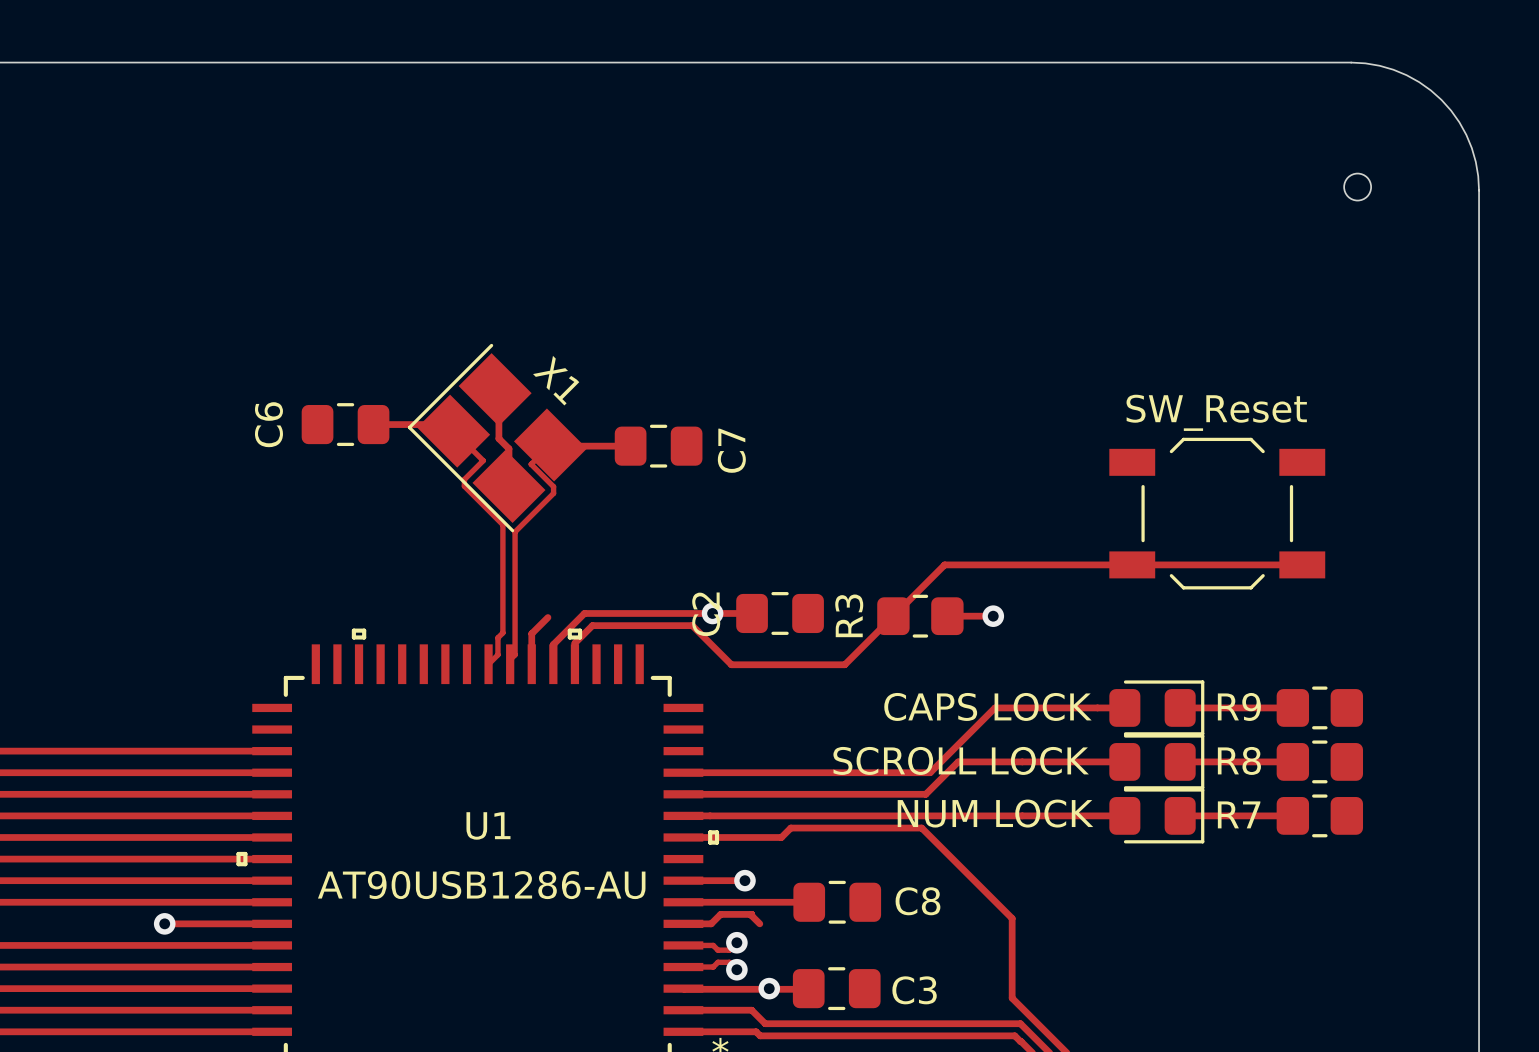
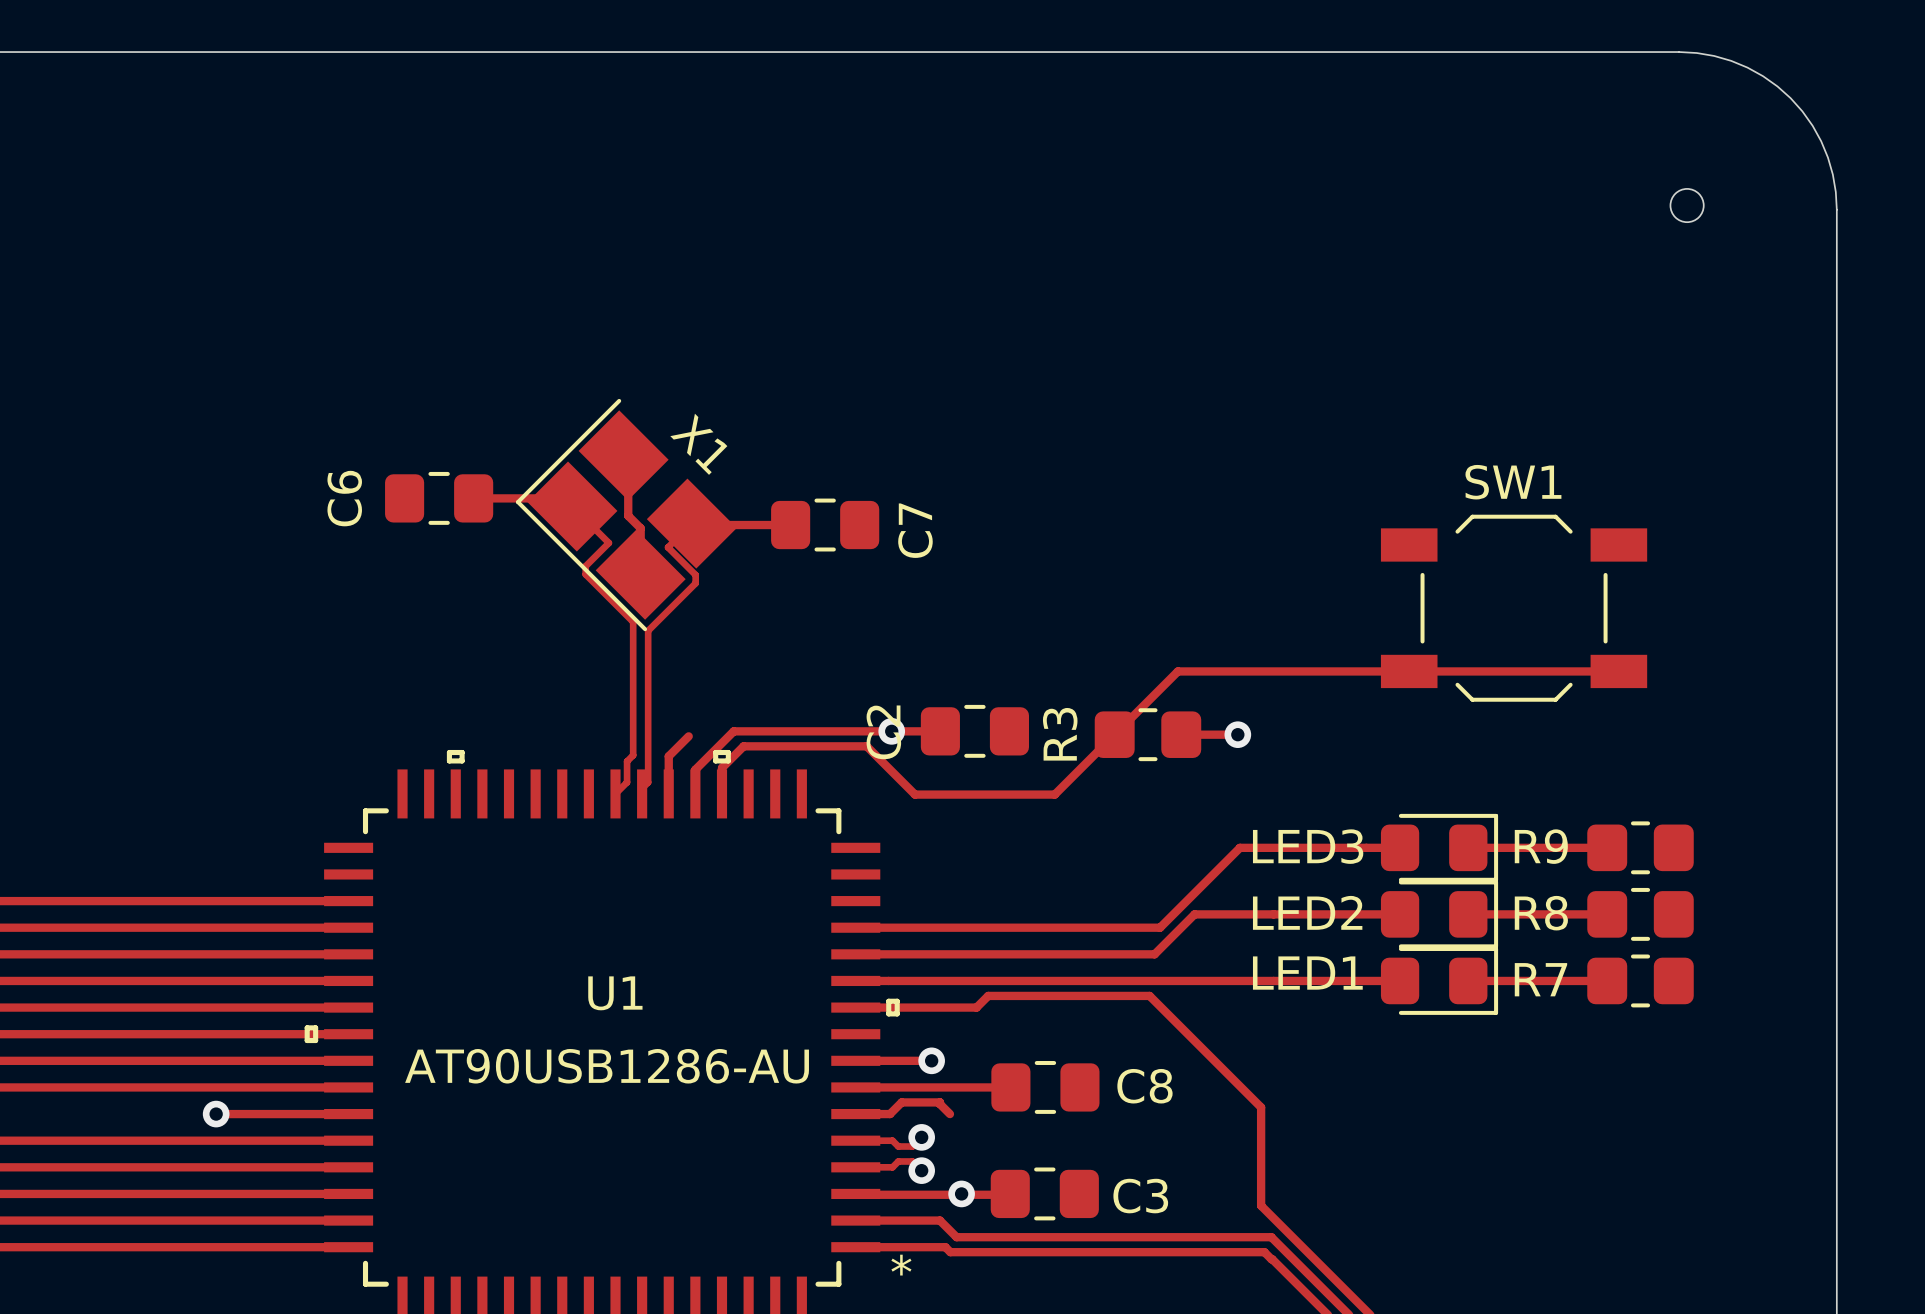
SW1 name: none -> SW1 (1513, 482)
text: SW_Reset (1216, 412) -> none
CAPS LOCK name: CAPS LOCK (987, 706) -> LED3 (1308, 846)
SCROLL LOCK name: SCROLL LOCK (961, 760) -> LED2 (1307, 912)
NUM LOCK name: NUM LOCK (995, 813) -> LED1 (1307, 973)

